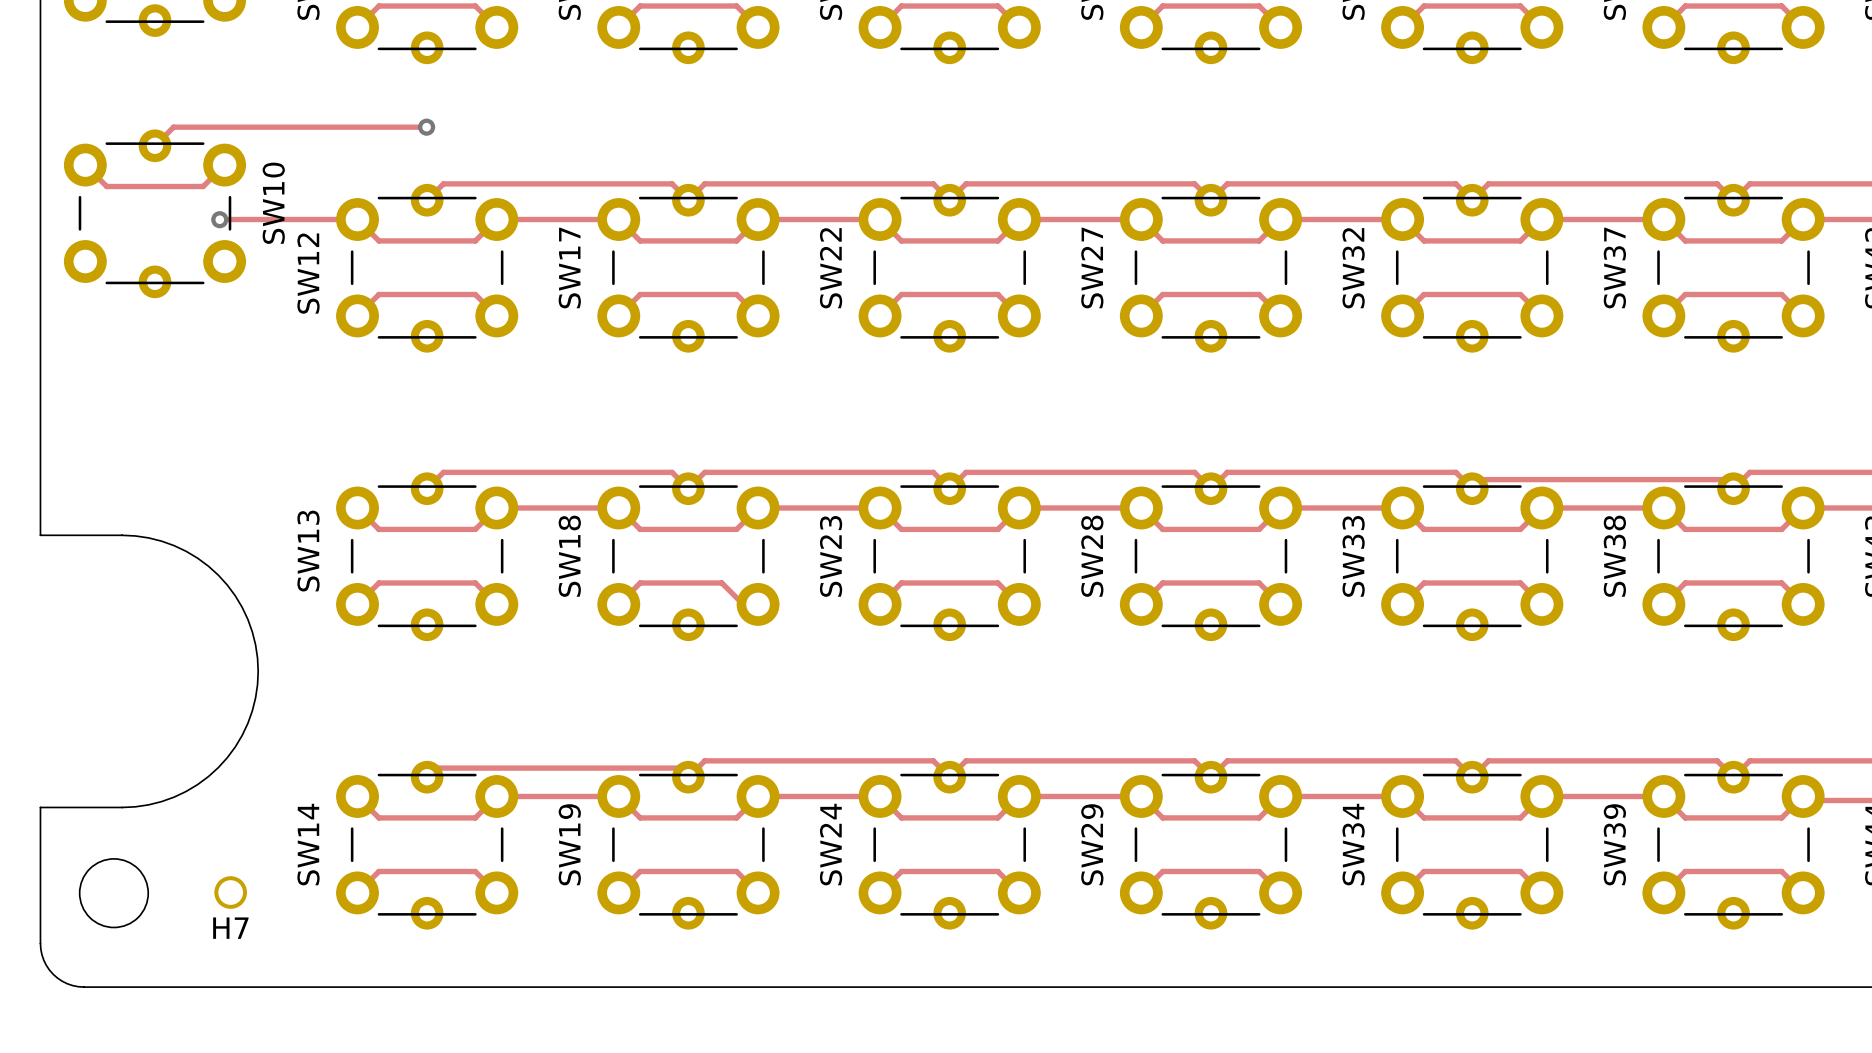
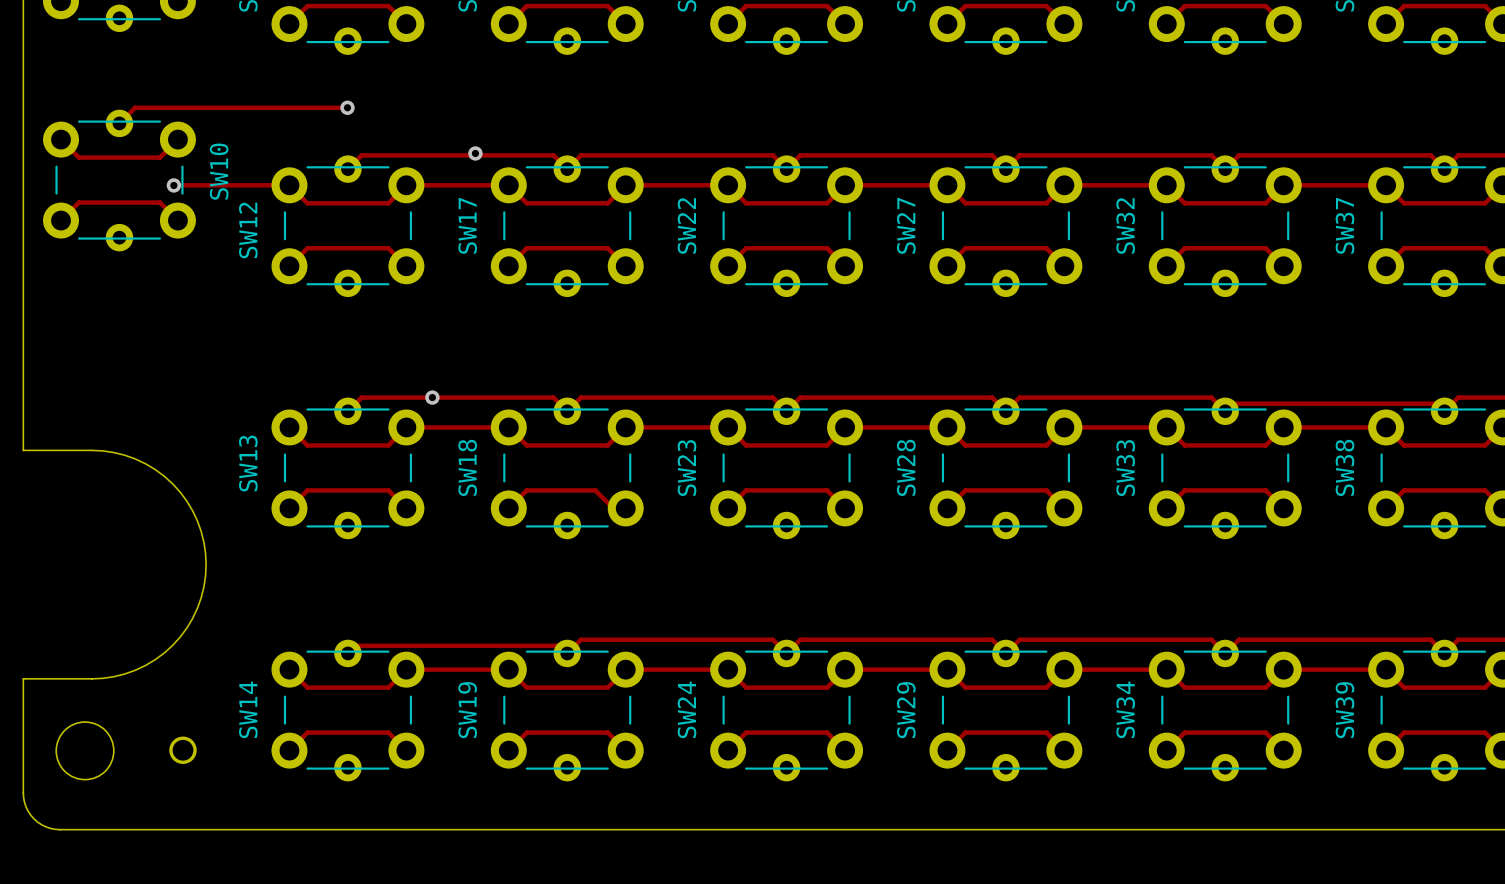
via: none -> (475, 153)
track: none -> (61, 220) (79, 202) (159, 202) (177, 220)
via: none -> (432, 397)
H7 name: H7 (230, 928) -> none

